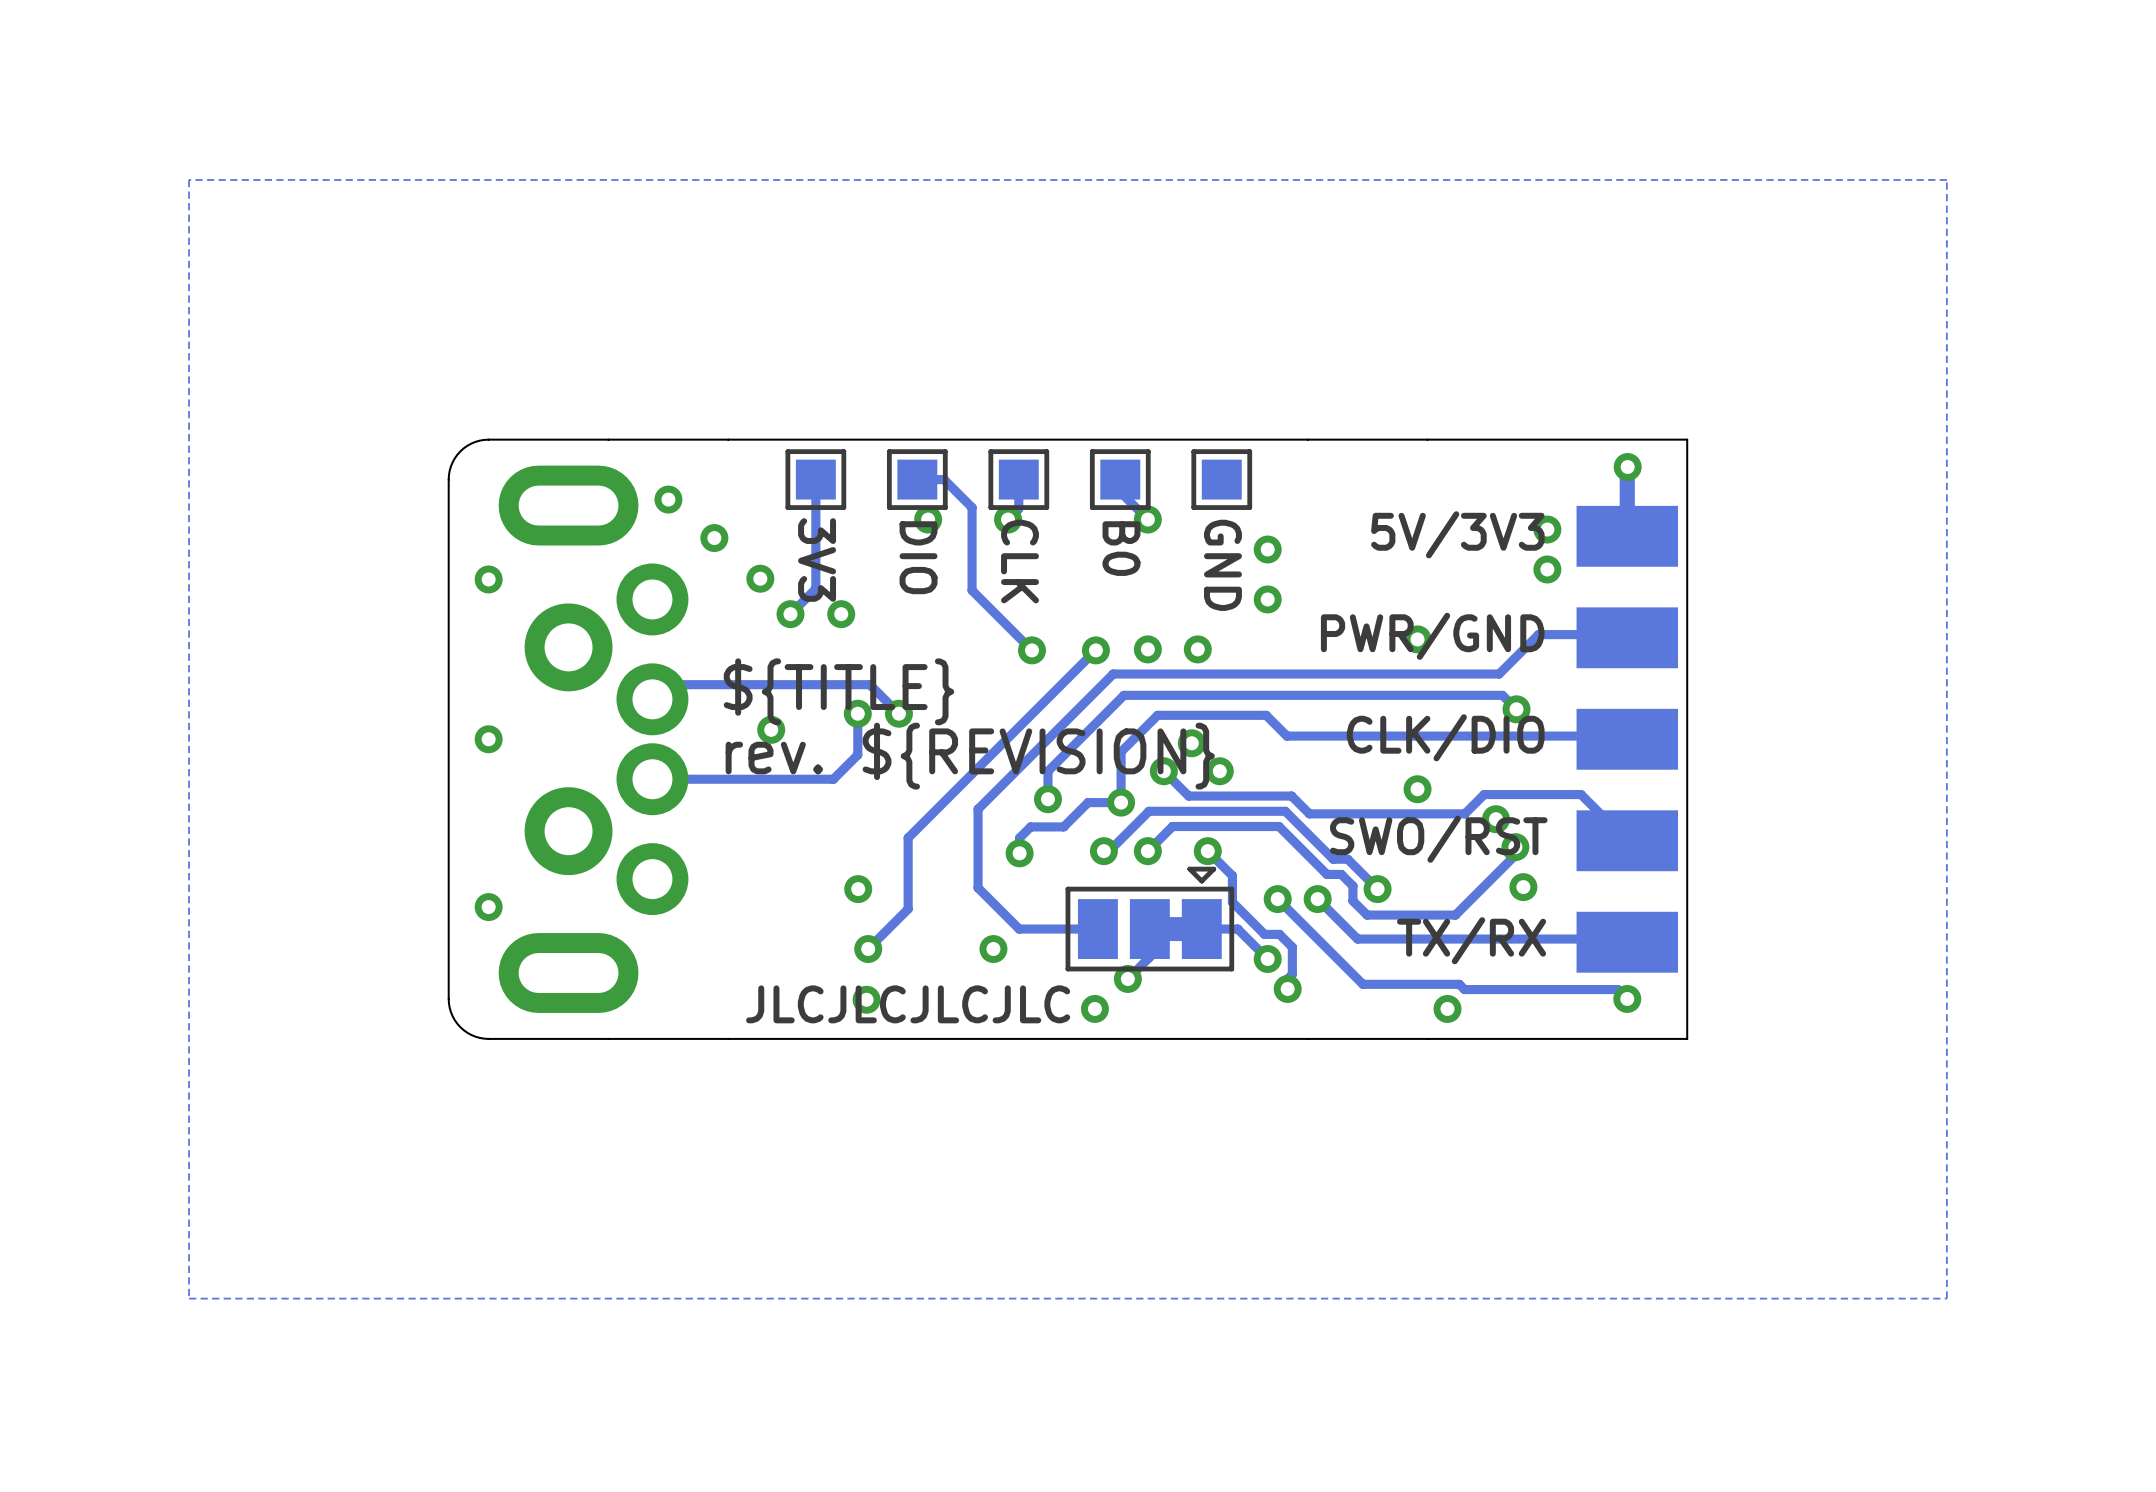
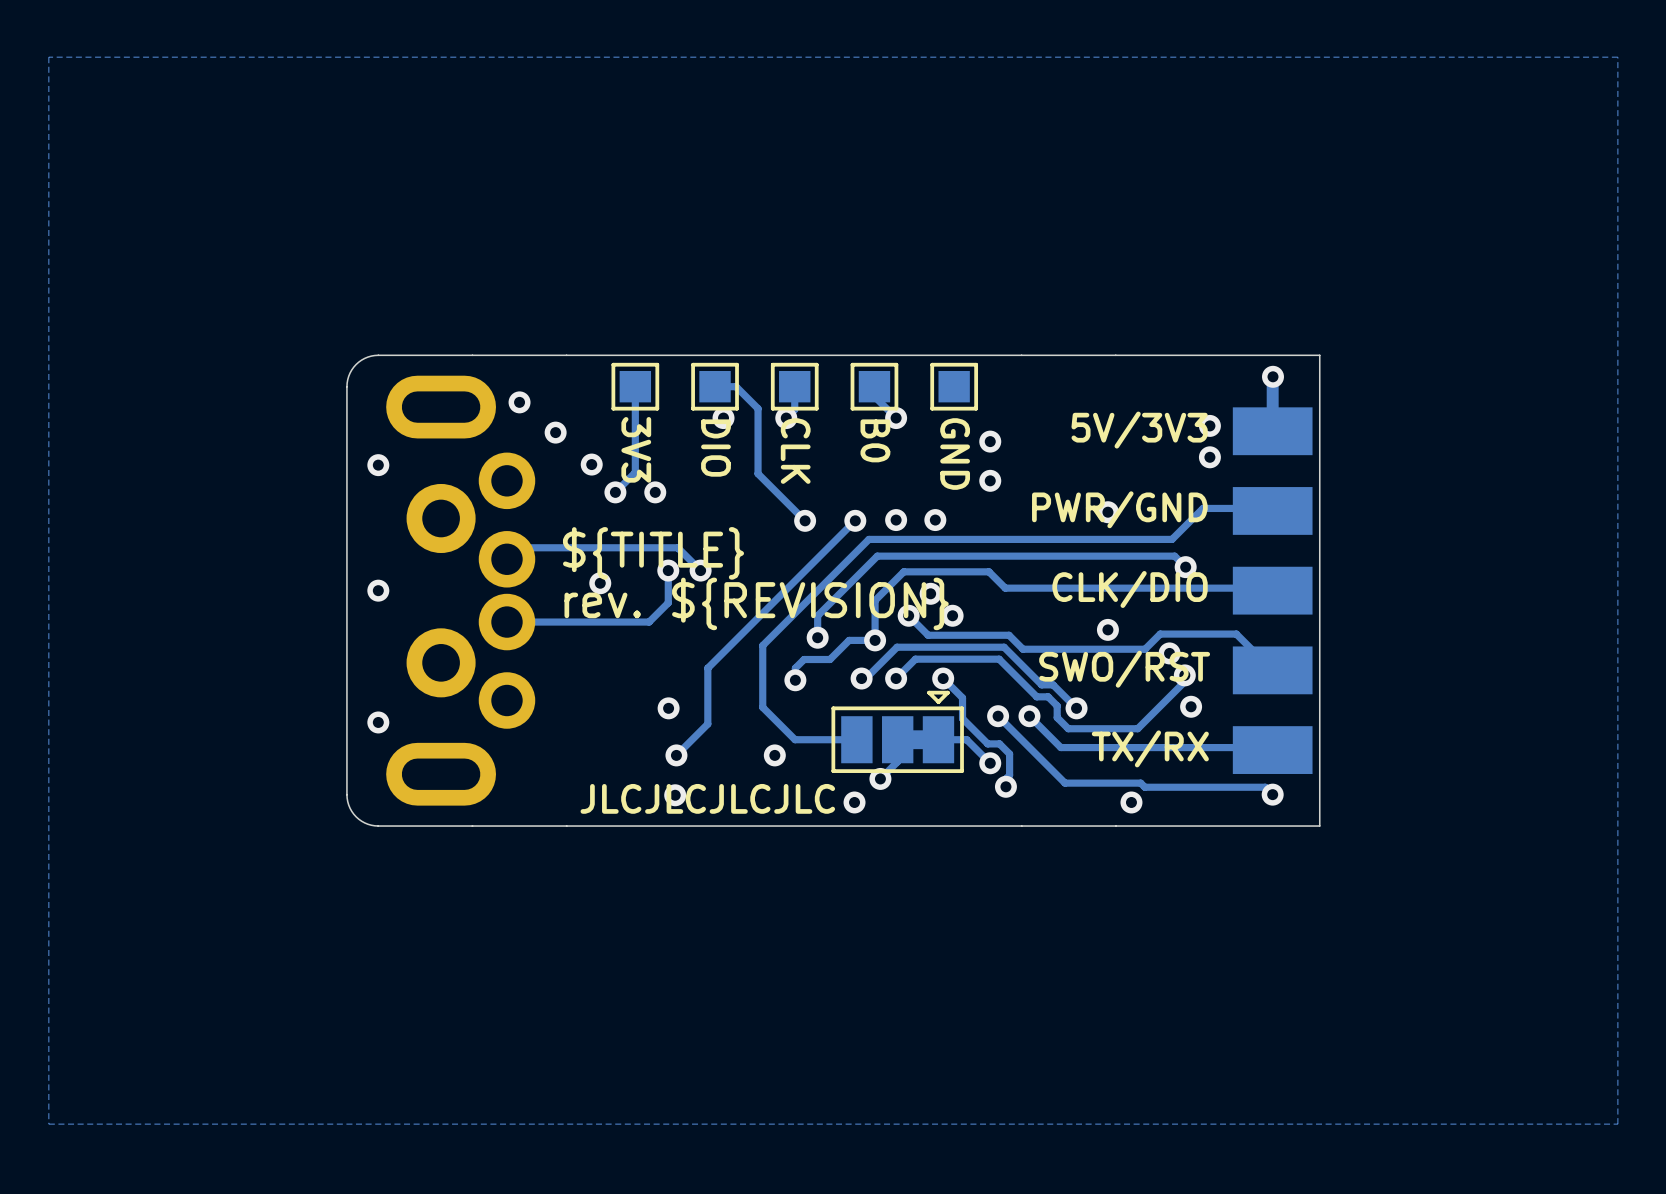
zone outline: (1946, 179) (1946, 1298) (189, 1298) (189, 179) (1946, 179) -> (1617, 57) (1617, 1124) (48, 1124) (48, 57) (1617, 57)

